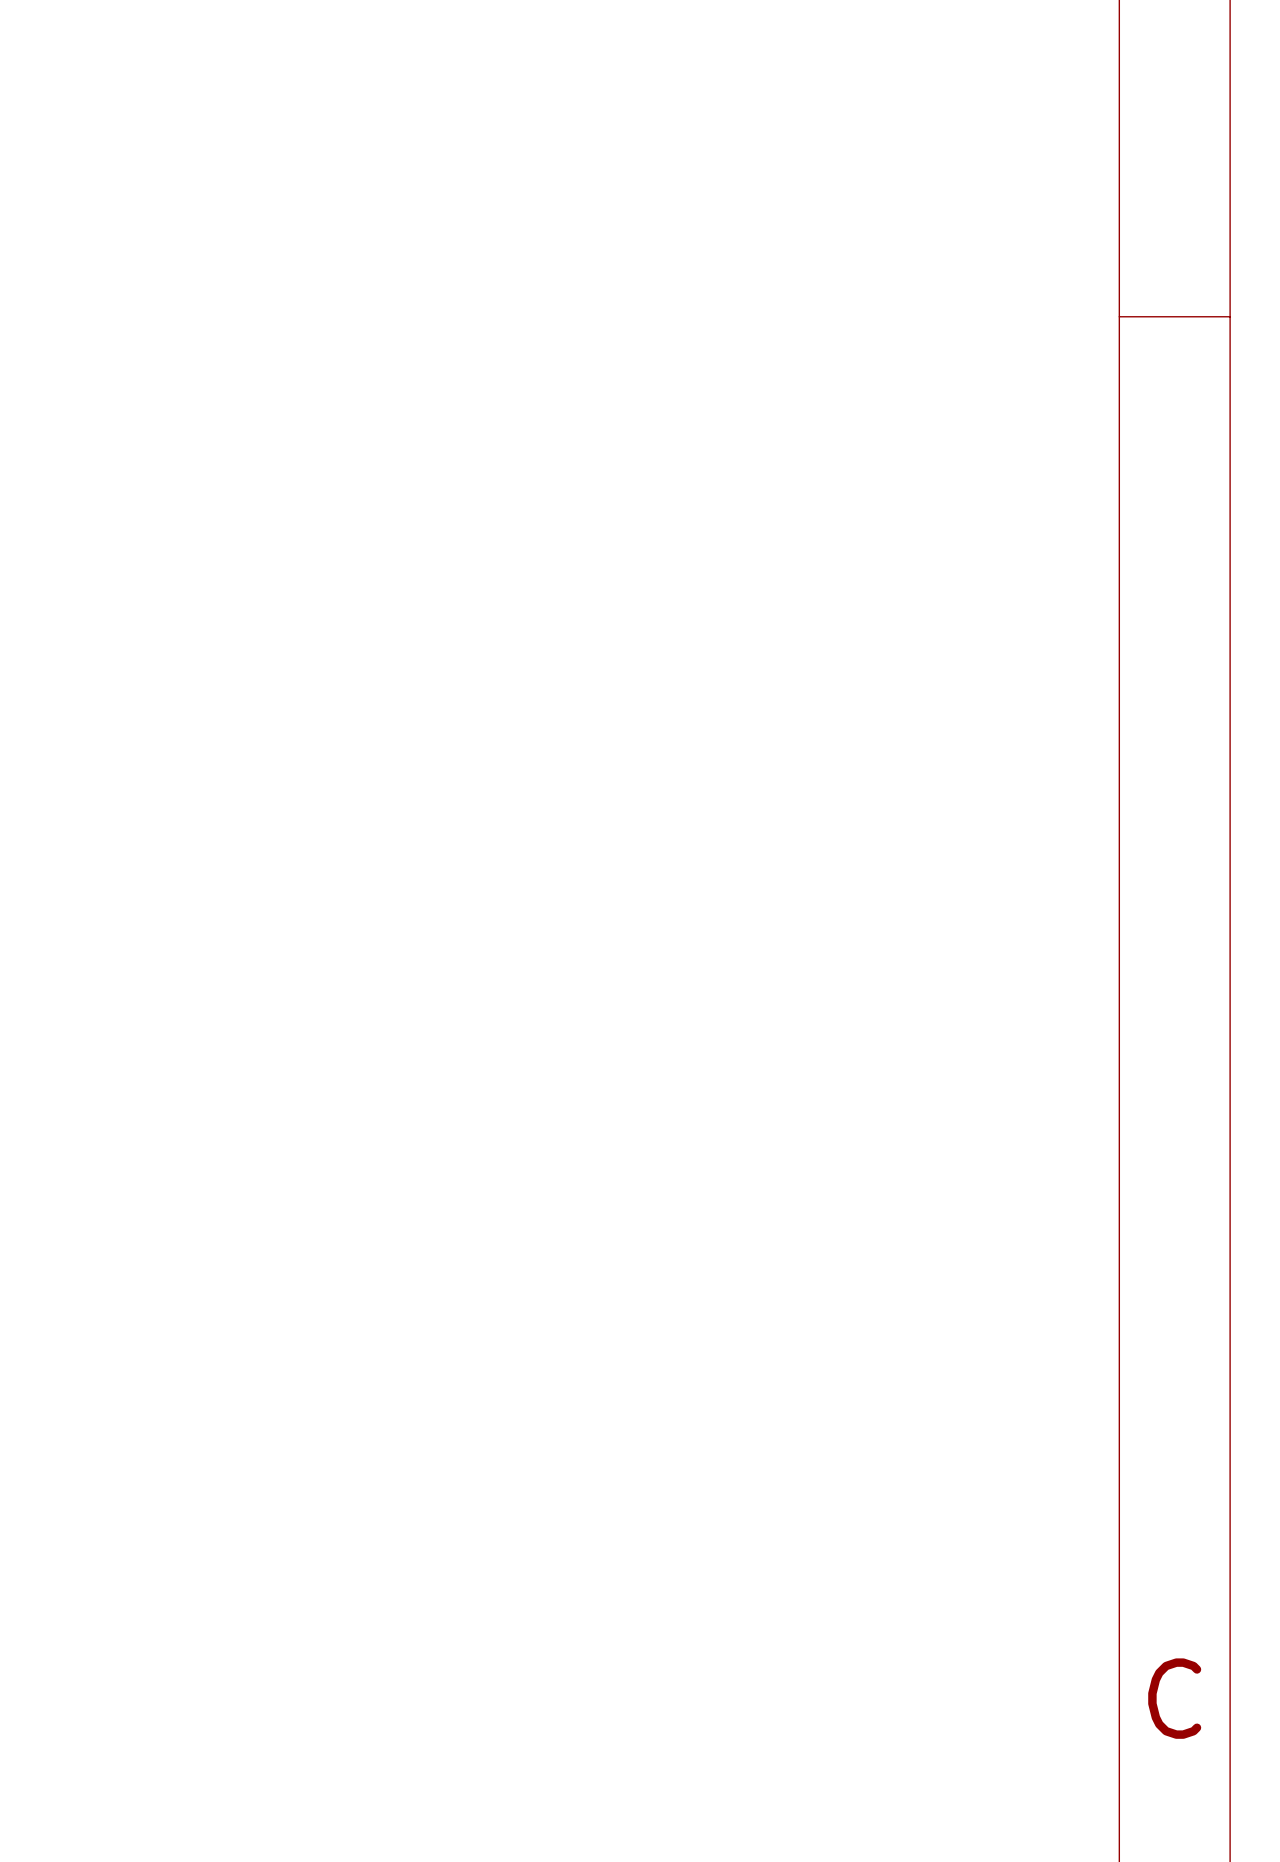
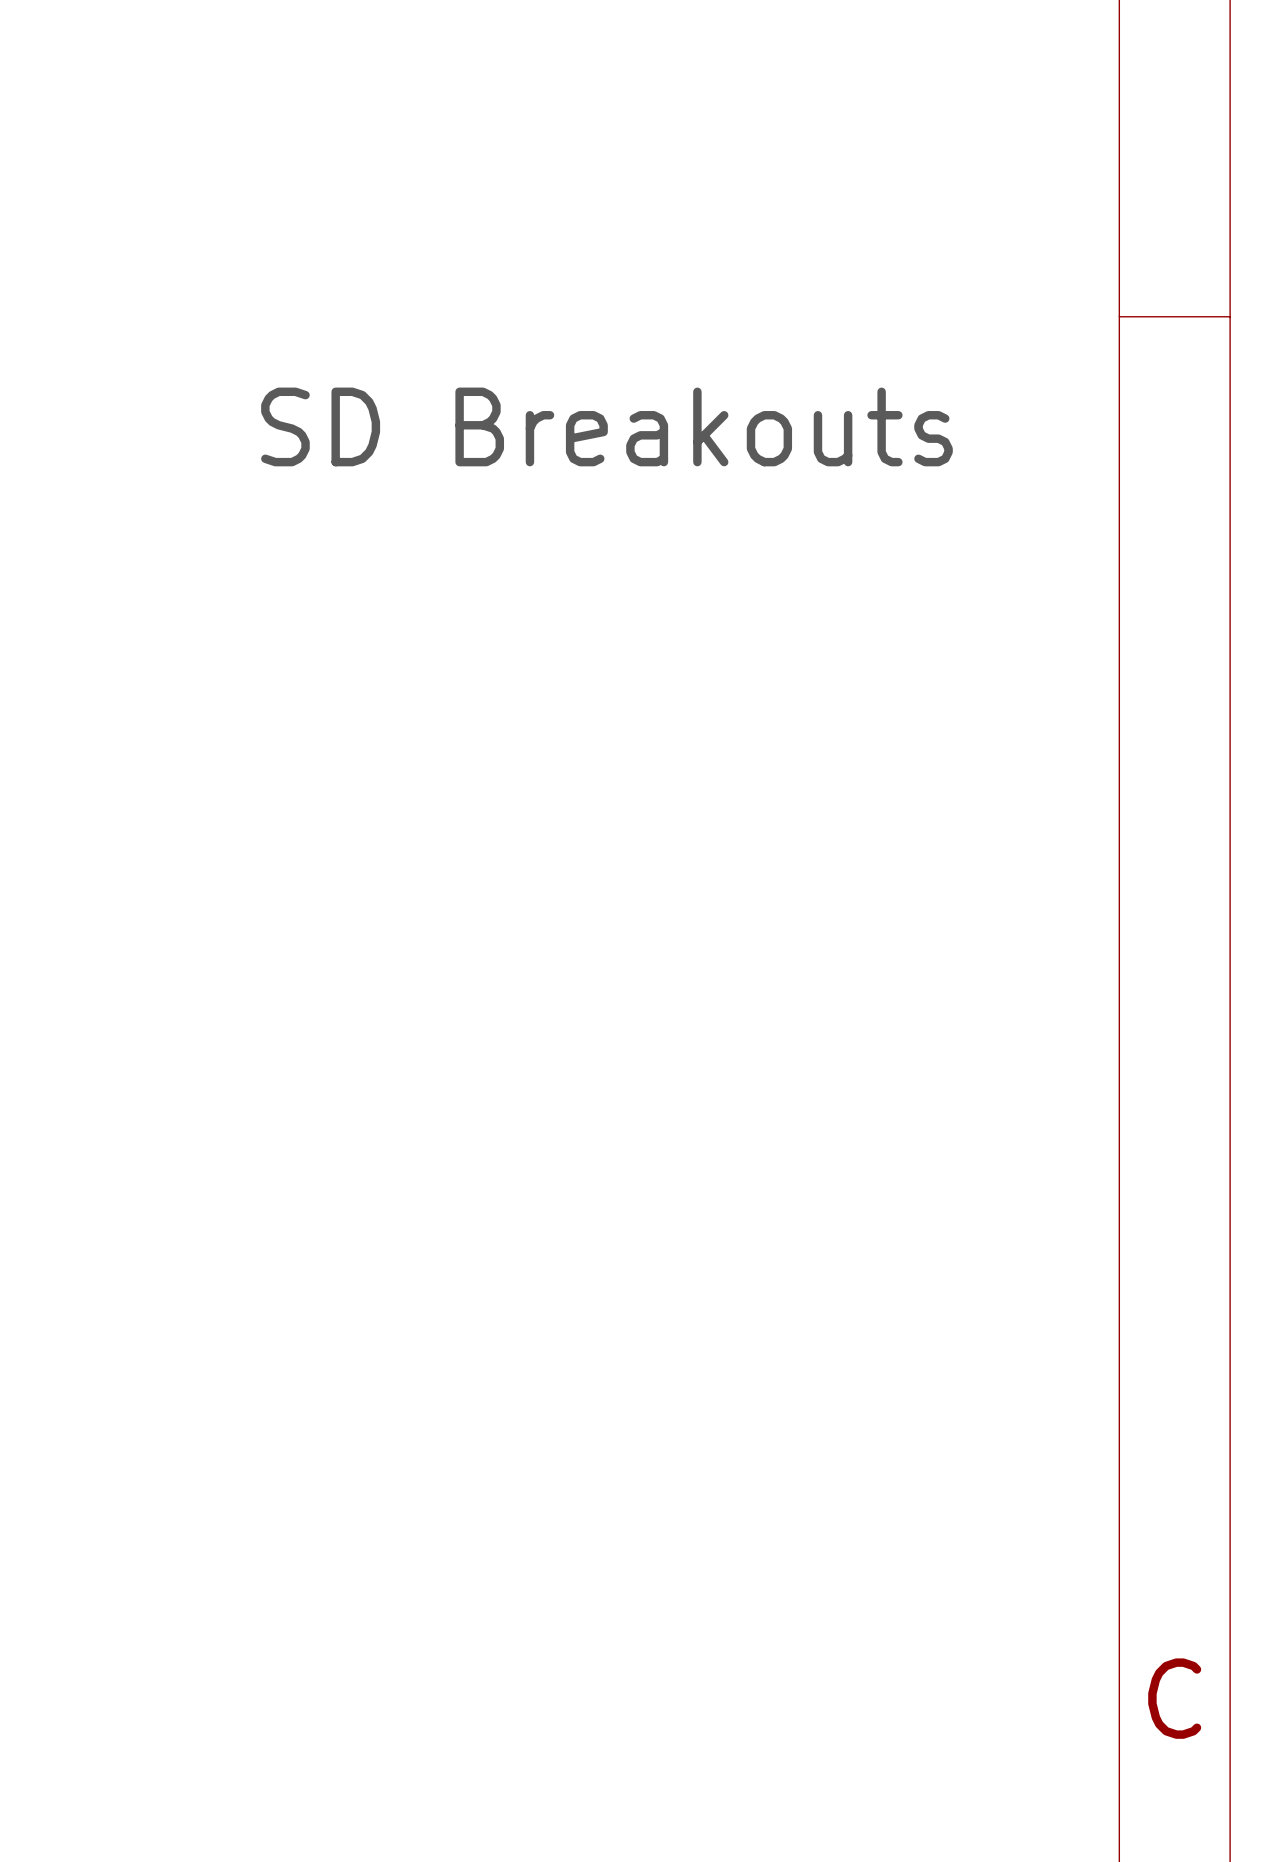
text: none -> SD Breakouts (606, 426)

